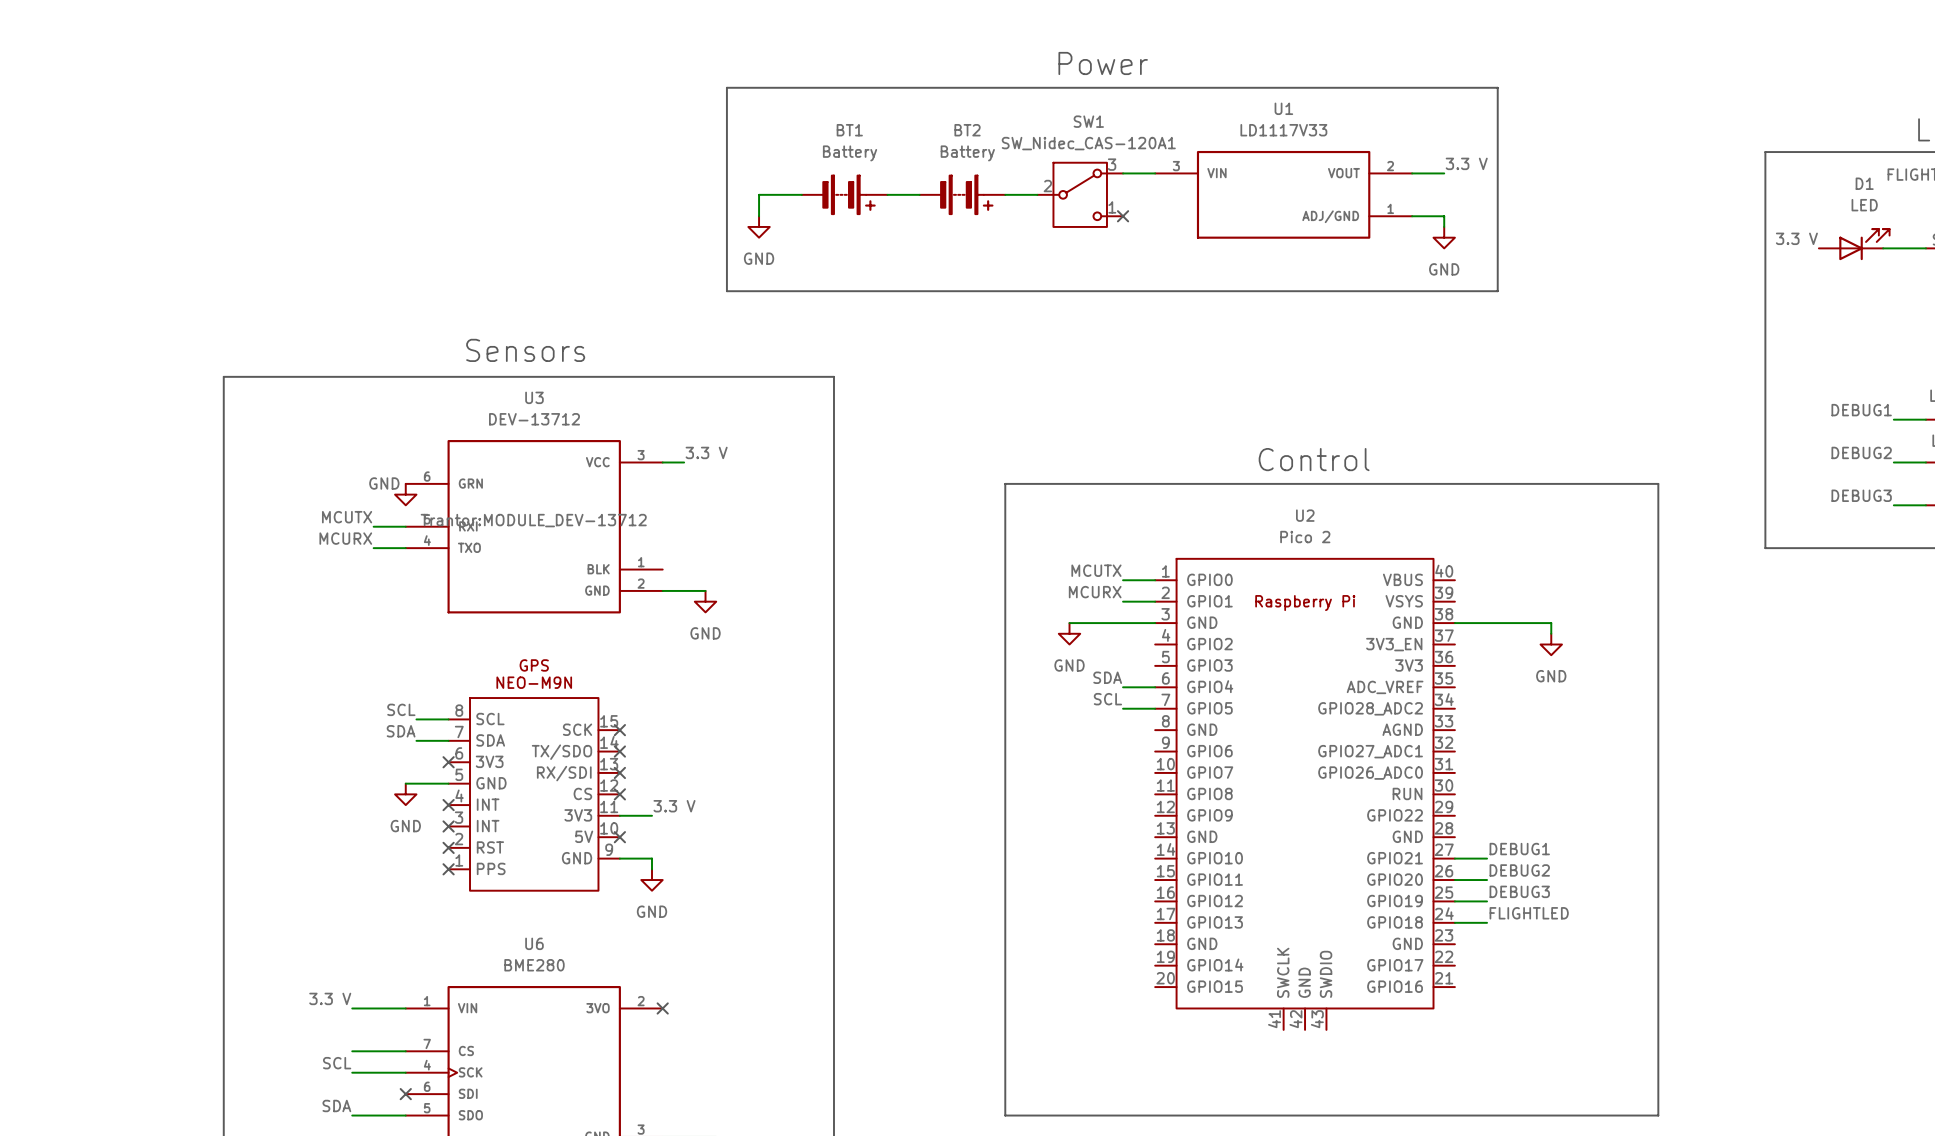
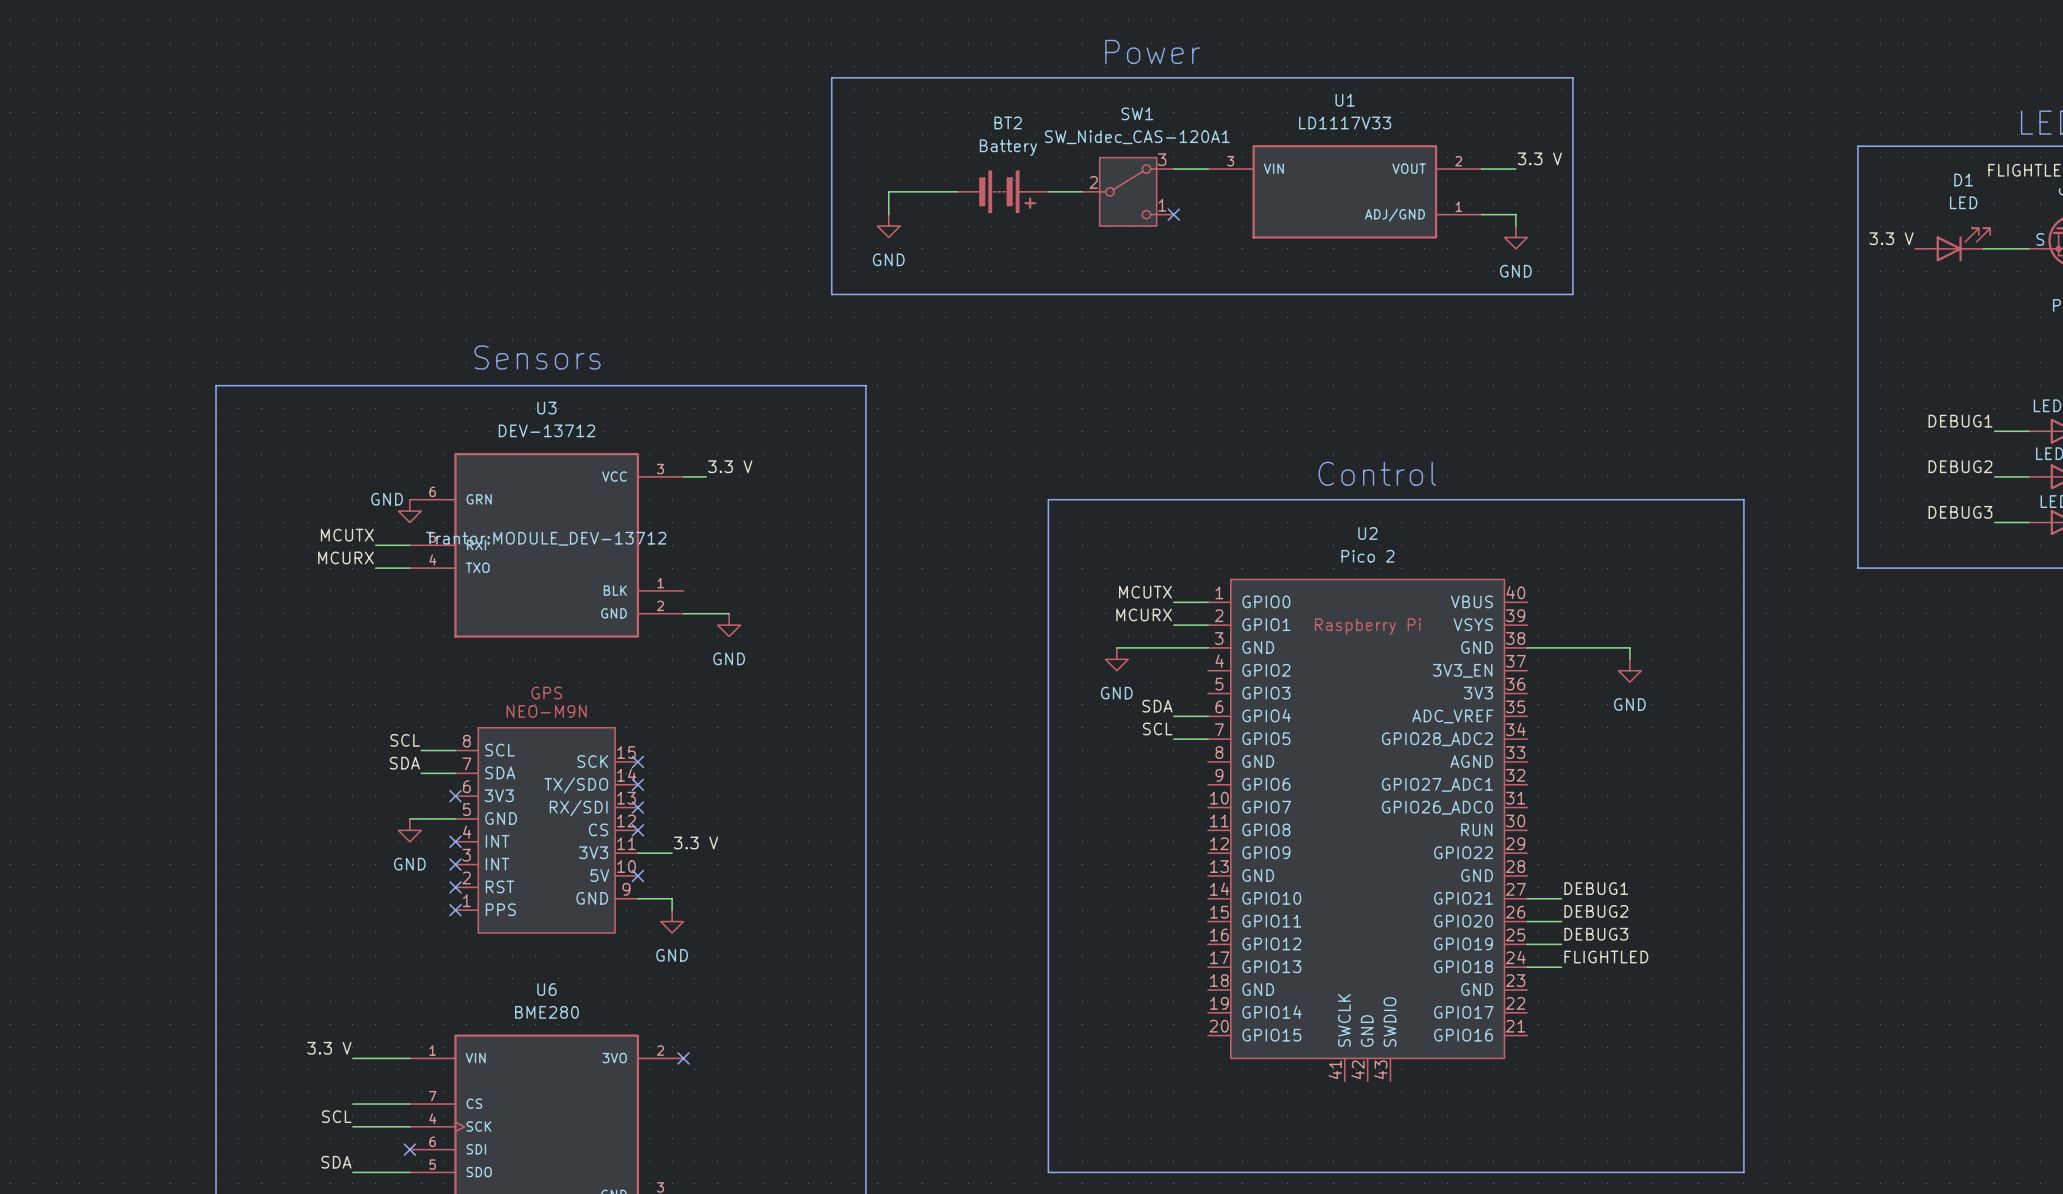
line: (801, 87) (726, 87) (726, 291) (801, 291) -> (831, 77) (831, 294)
wire: (801, 194) (759, 194) (759, 216) -> none
BT1: Battery (844, 194) -> none
power symbol position: GND (759, 226) -> GND (888, 226)

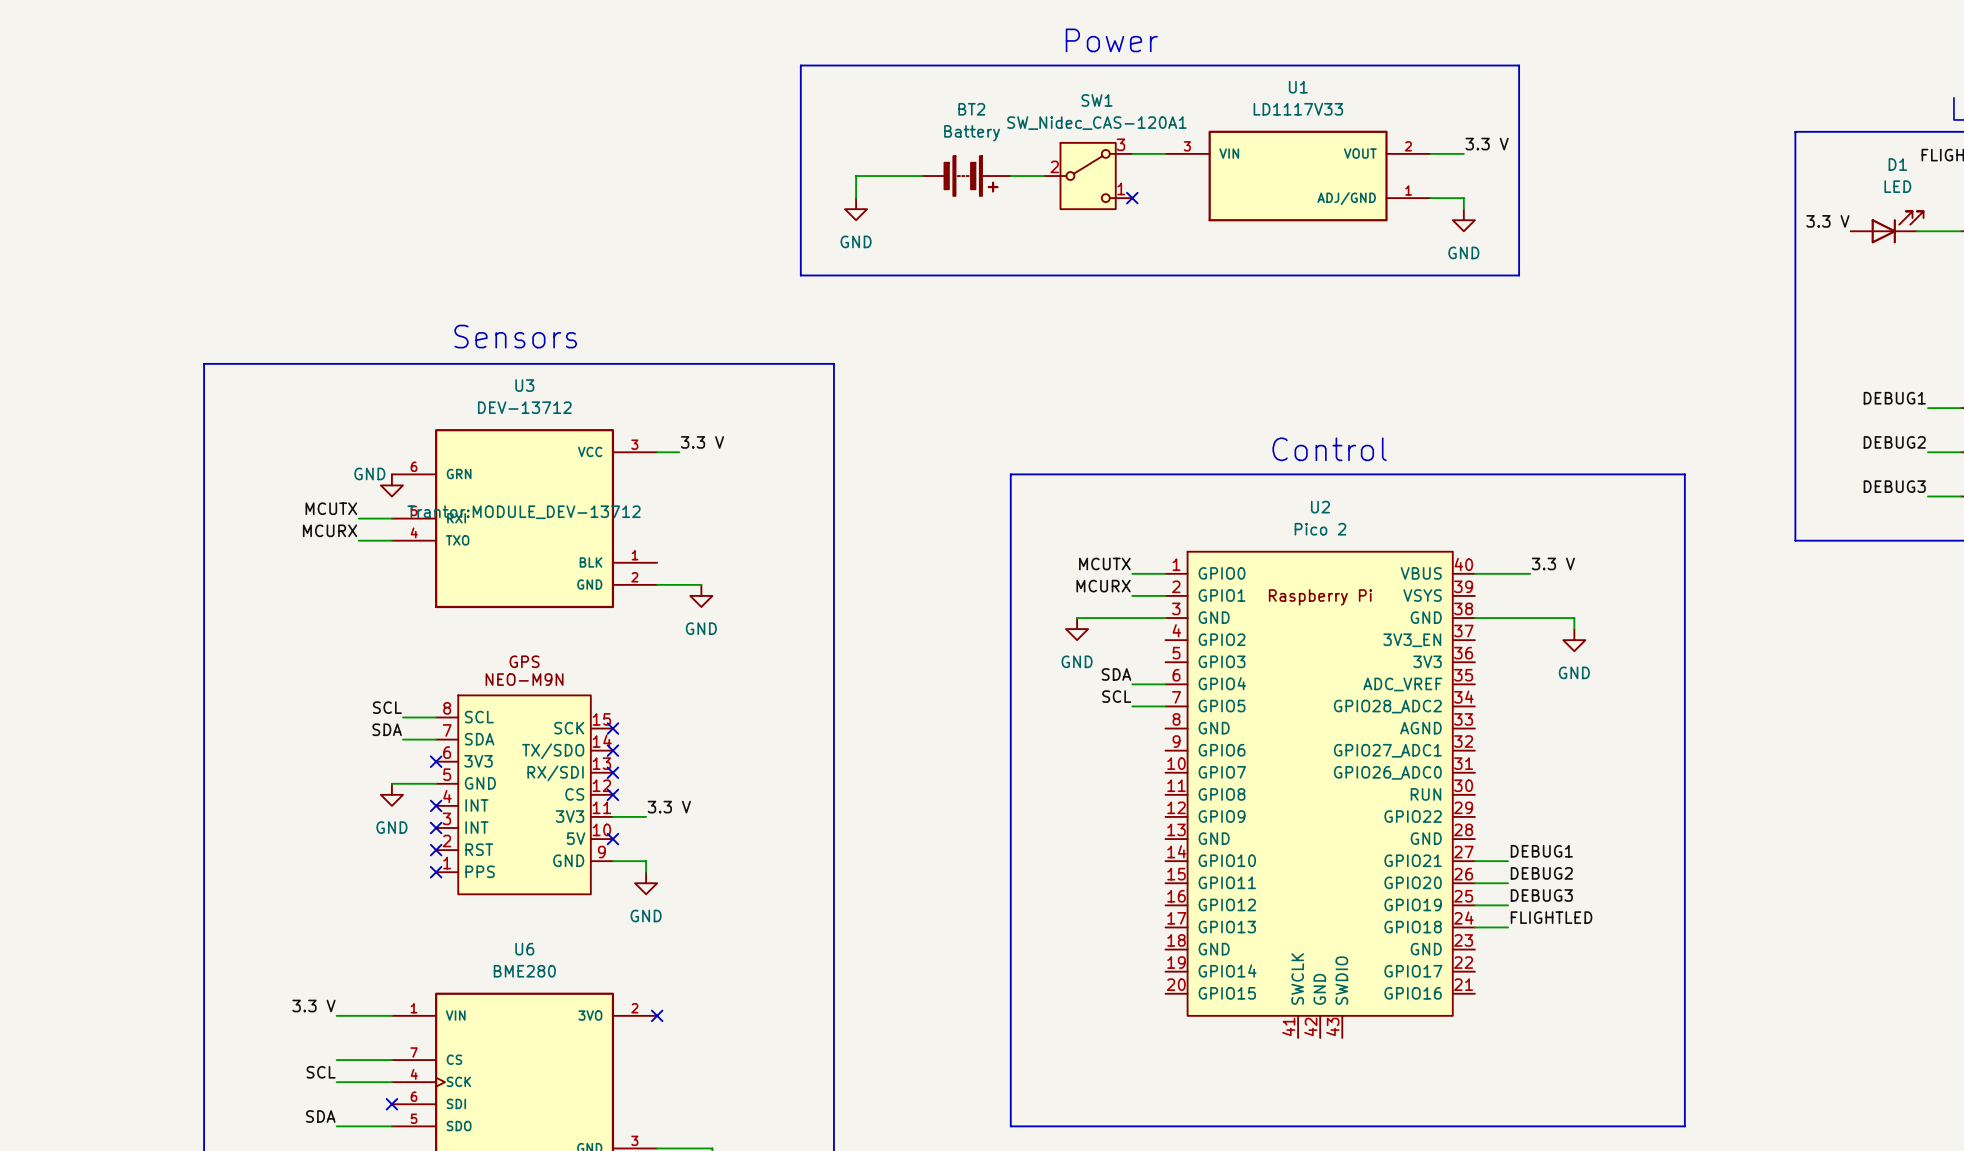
label: none -> 3.3 V (1553, 563)
wire: none -> (1474, 573) (1530, 573)

